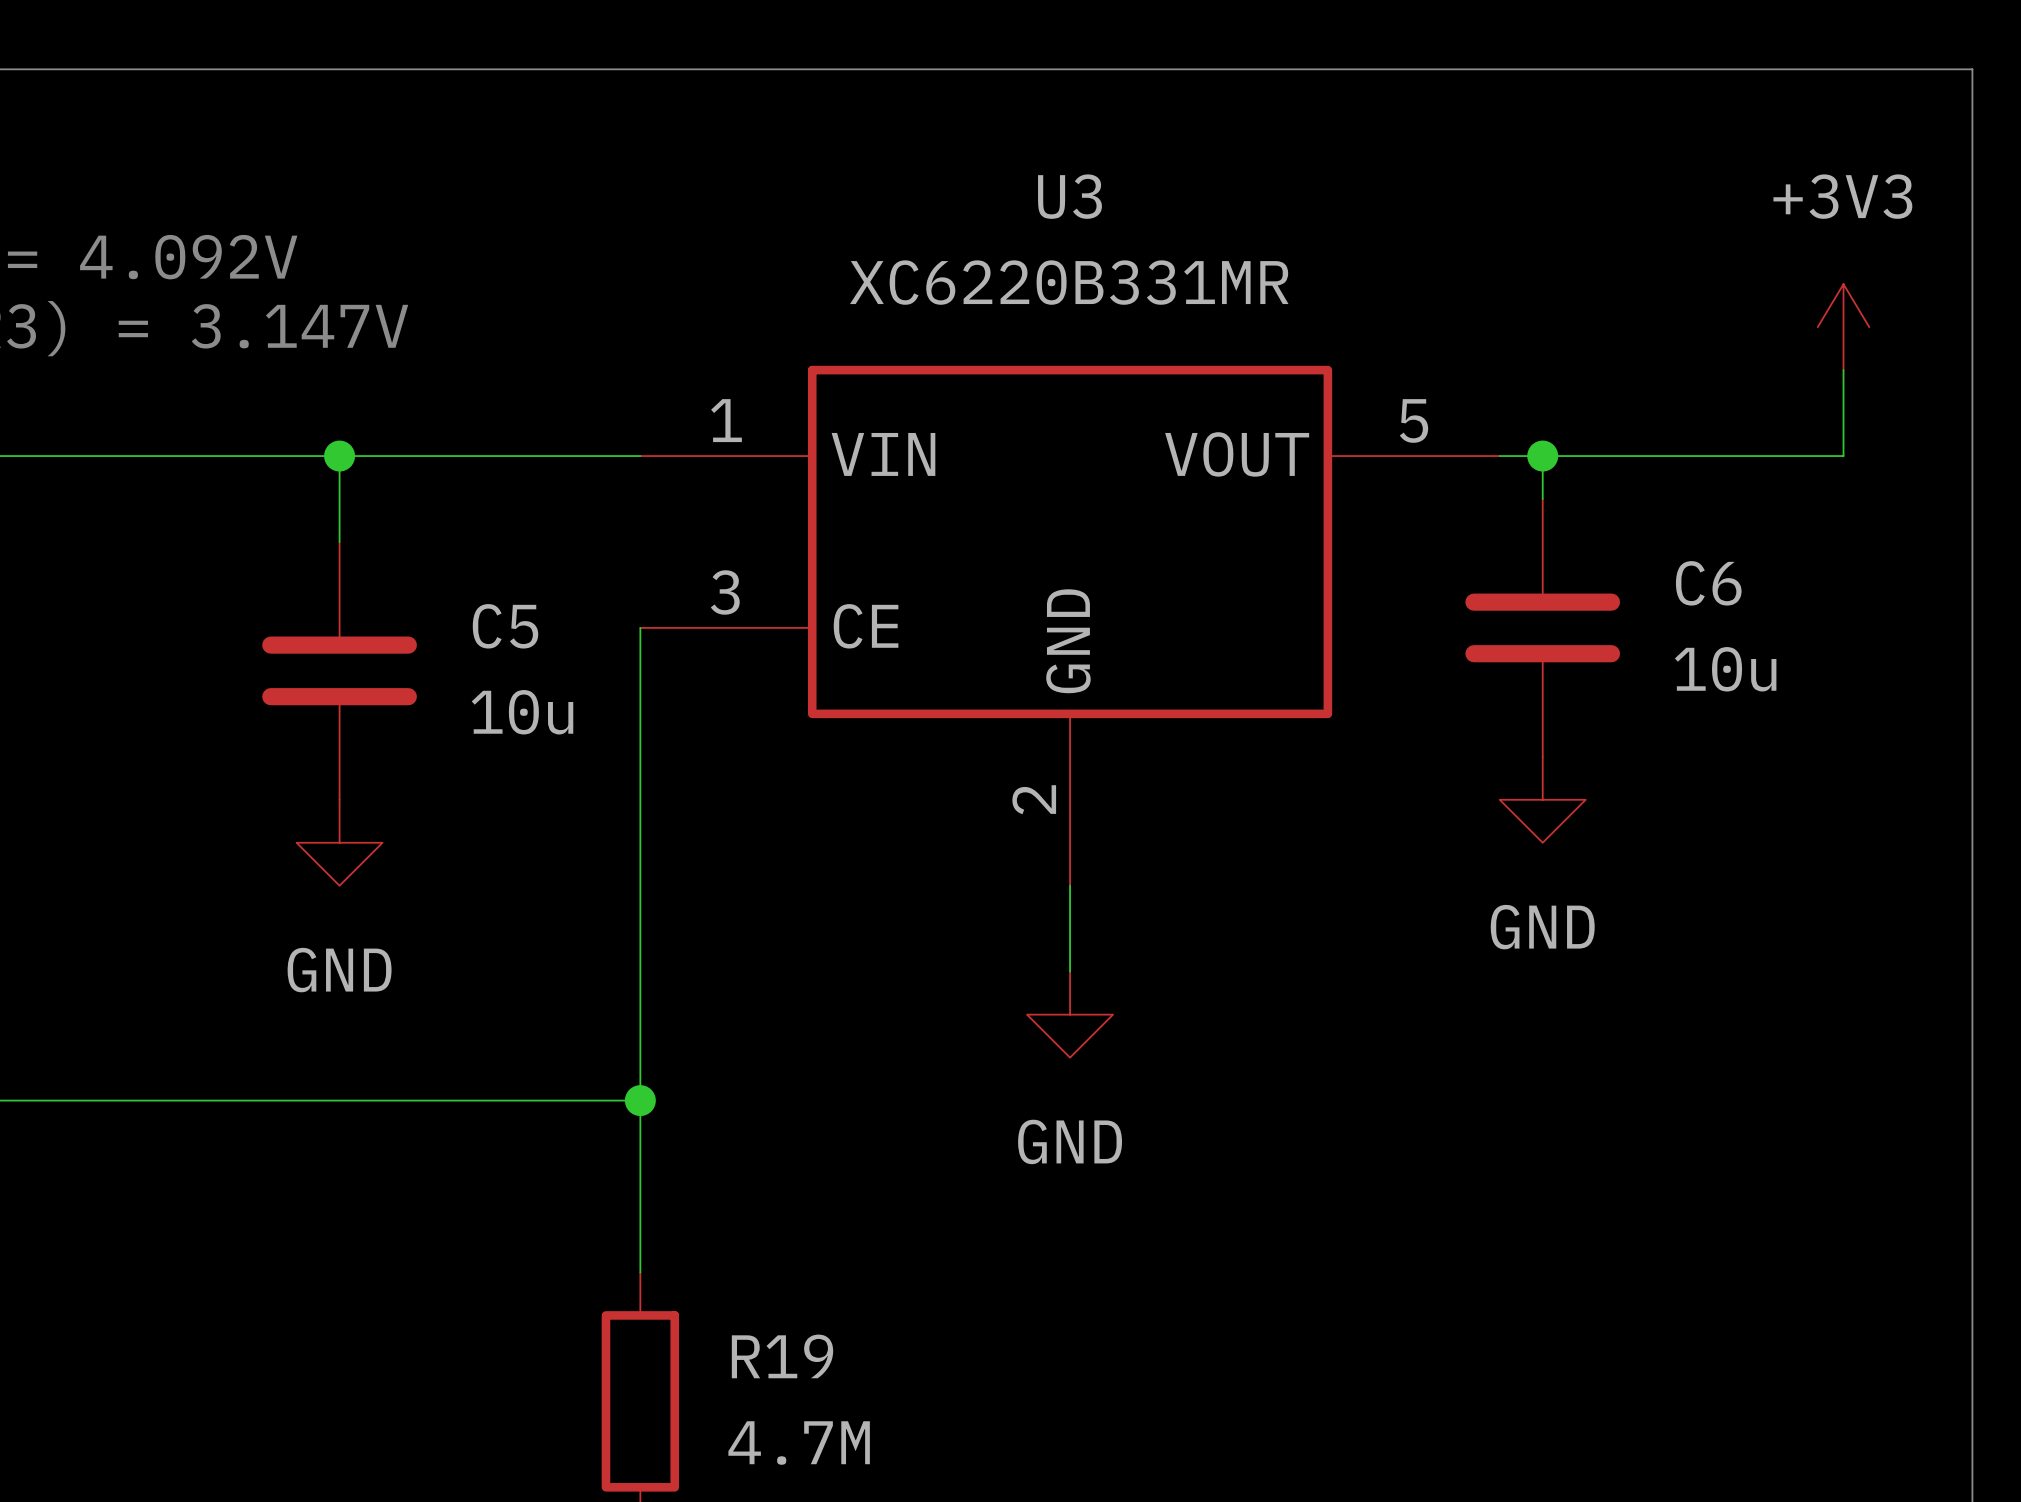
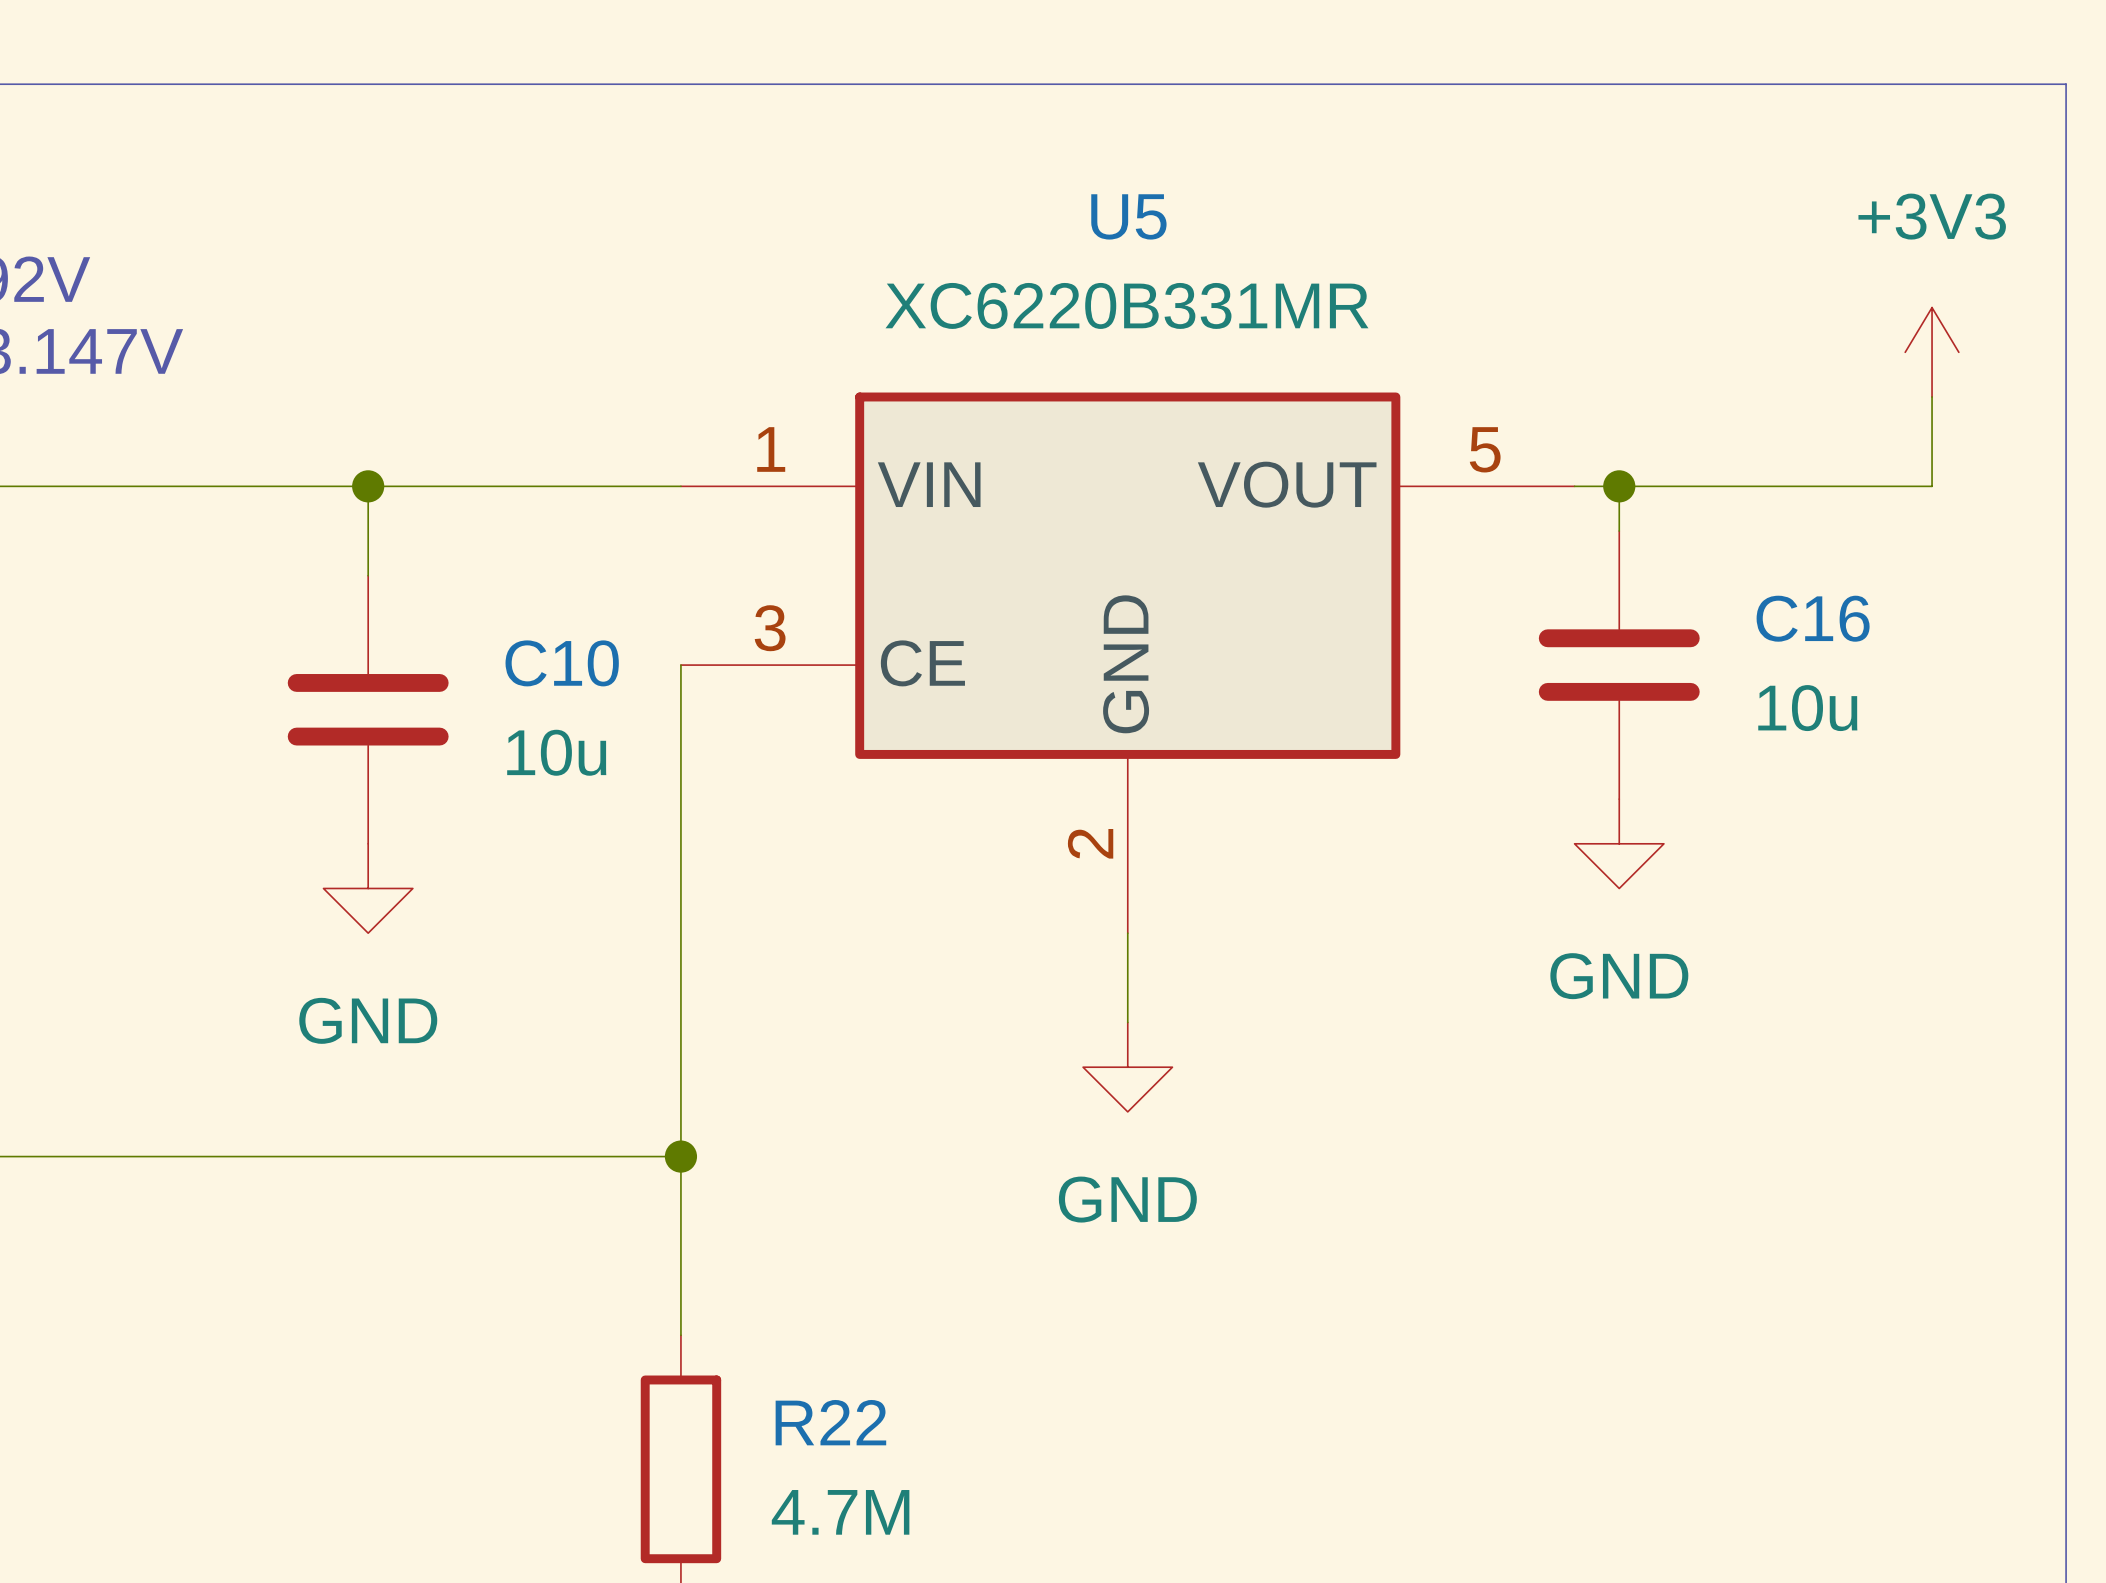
U3 name: U3 (1069, 196) -> U5 (1128, 216)
C6 name: C6 (1708, 583) -> C16 (1813, 618)
C5 name: C5 (505, 626) -> C10 (562, 663)
R19 name: R19 (782, 1356) -> R22 (830, 1422)

